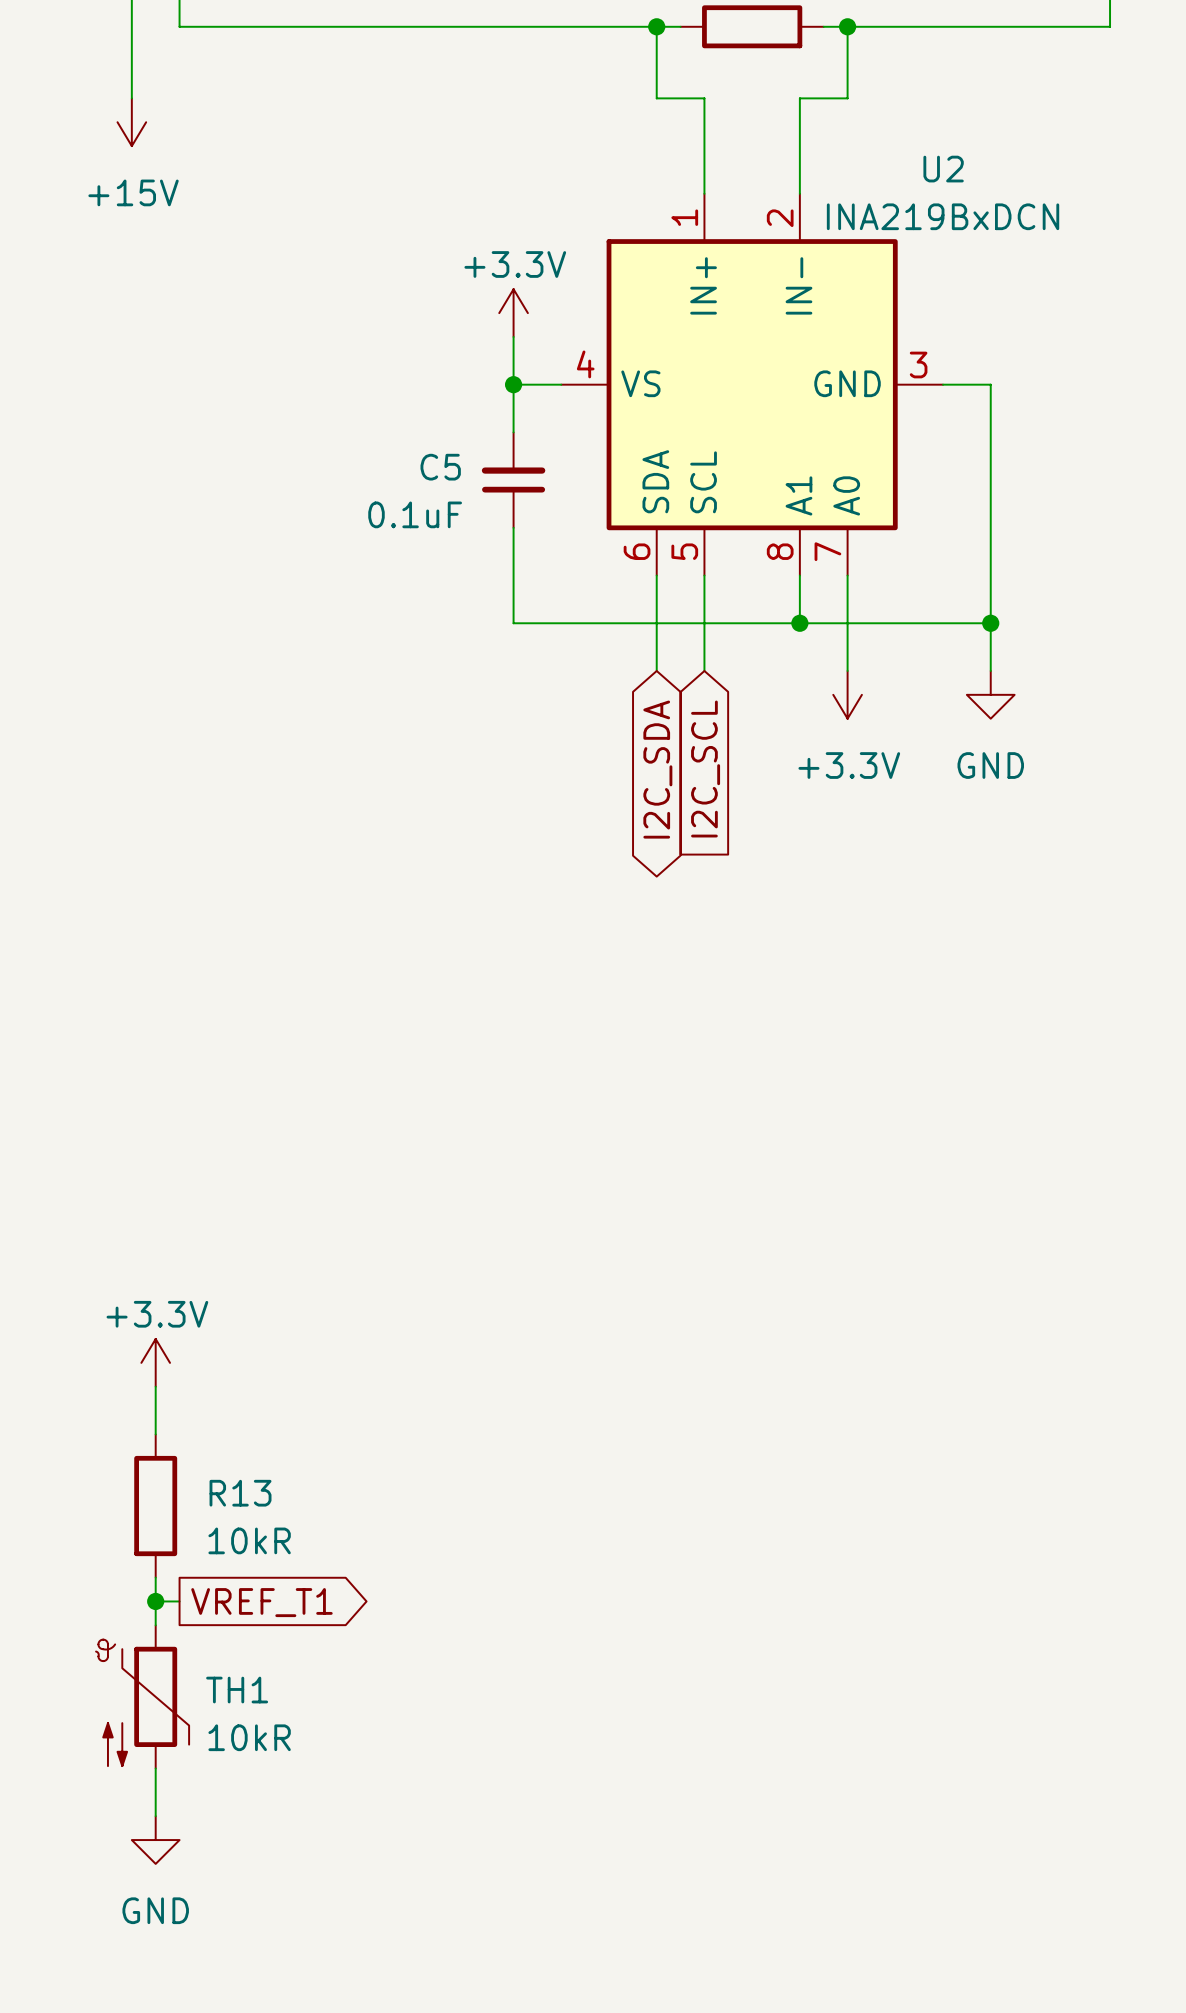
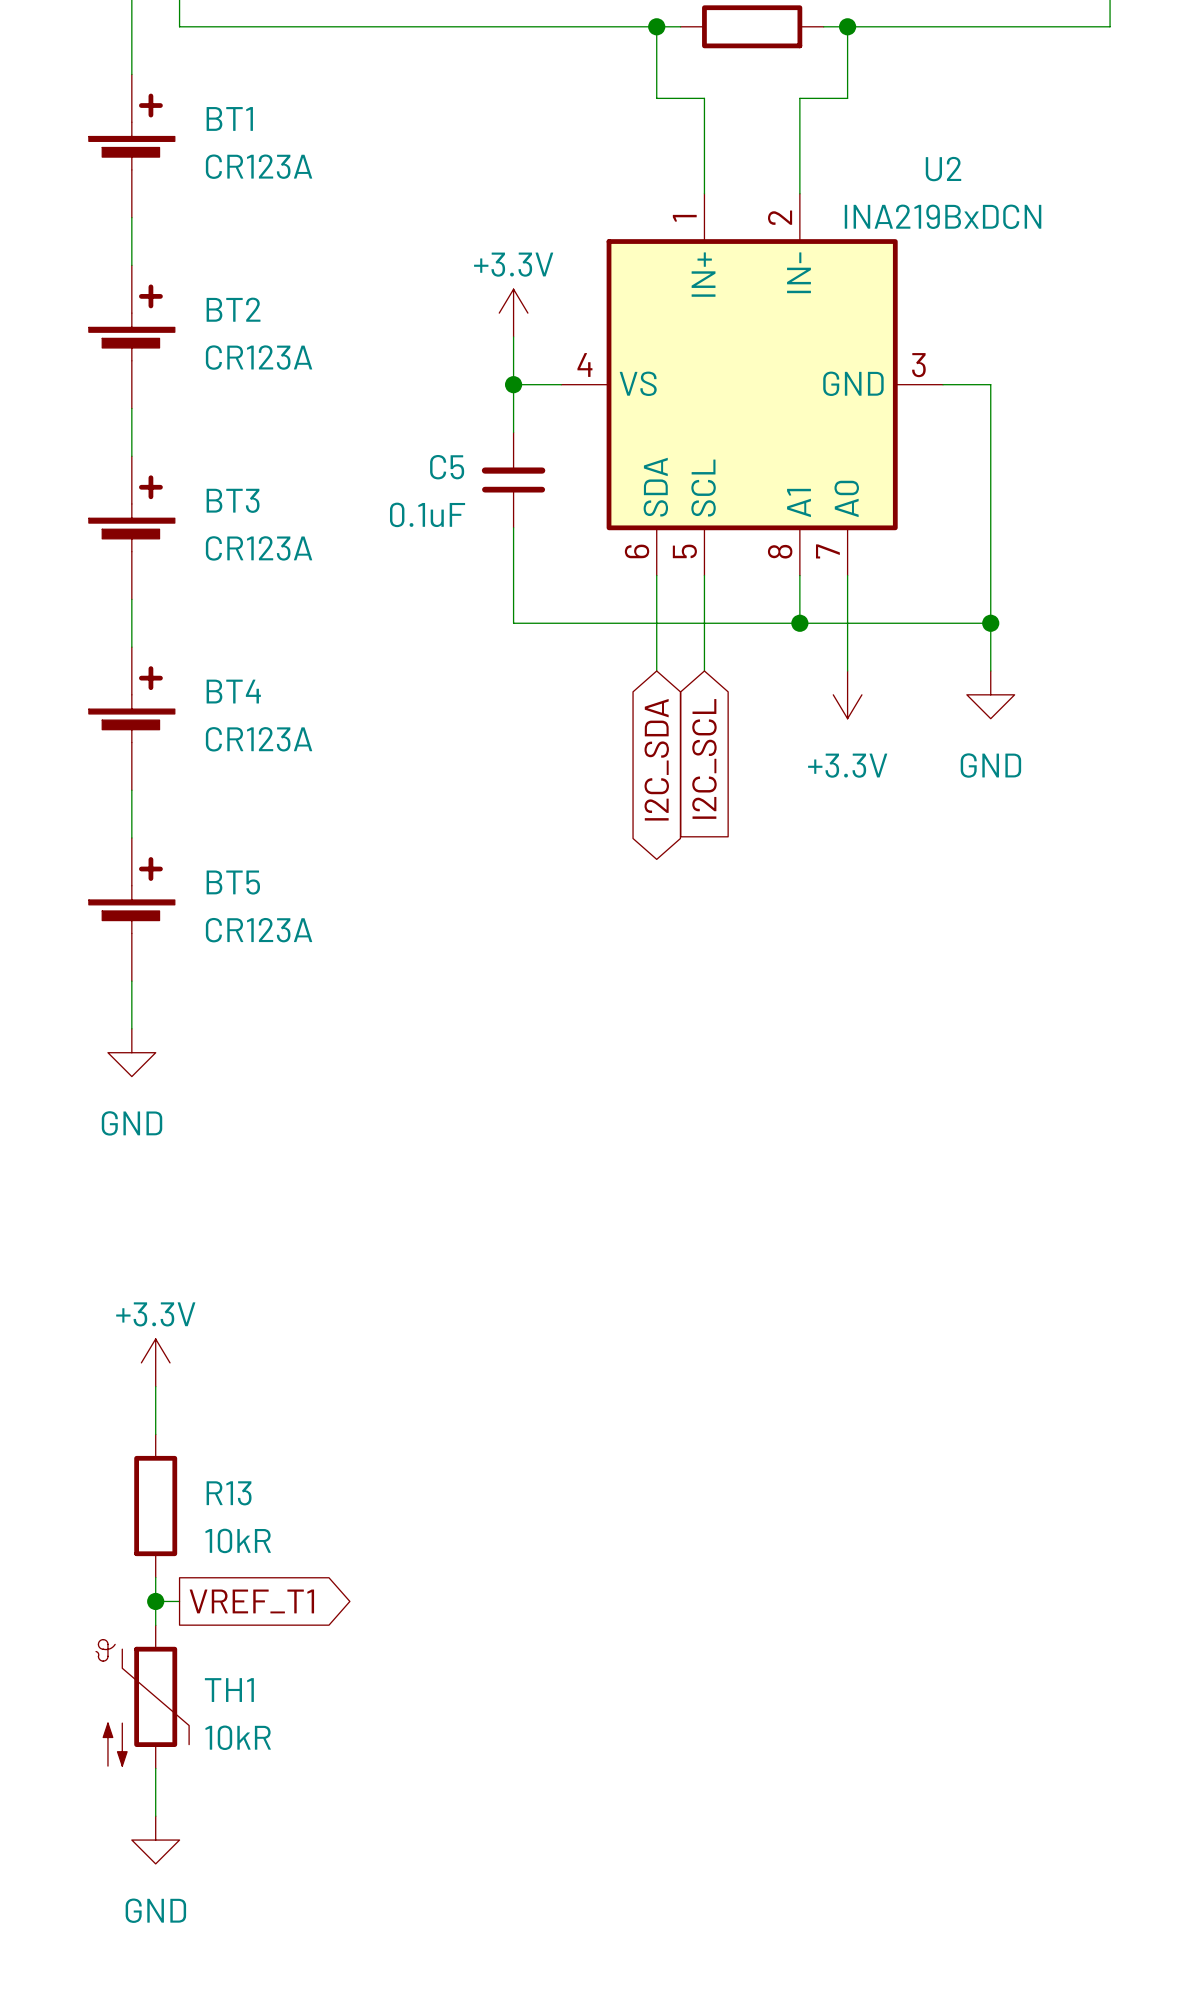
power symbol: +15V (131, 122) -> none
BT1: none -> CR123A (131, 146)
wire: none -> (131, 217) (131, 265)
BT2: none -> CR123A (131, 336)
wire: none -> (131, 408) (131, 456)
BT3: none -> CR123A (131, 527)
wire: none -> (131, 599) (131, 647)
BT4: none -> CR123A (131, 718)
wire: none -> (131, 790) (131, 837)
BT5: none -> CR123A (131, 909)
wire: none -> (131, 981) (131, 1028)
power symbol: none -> GND (131, 1052)

